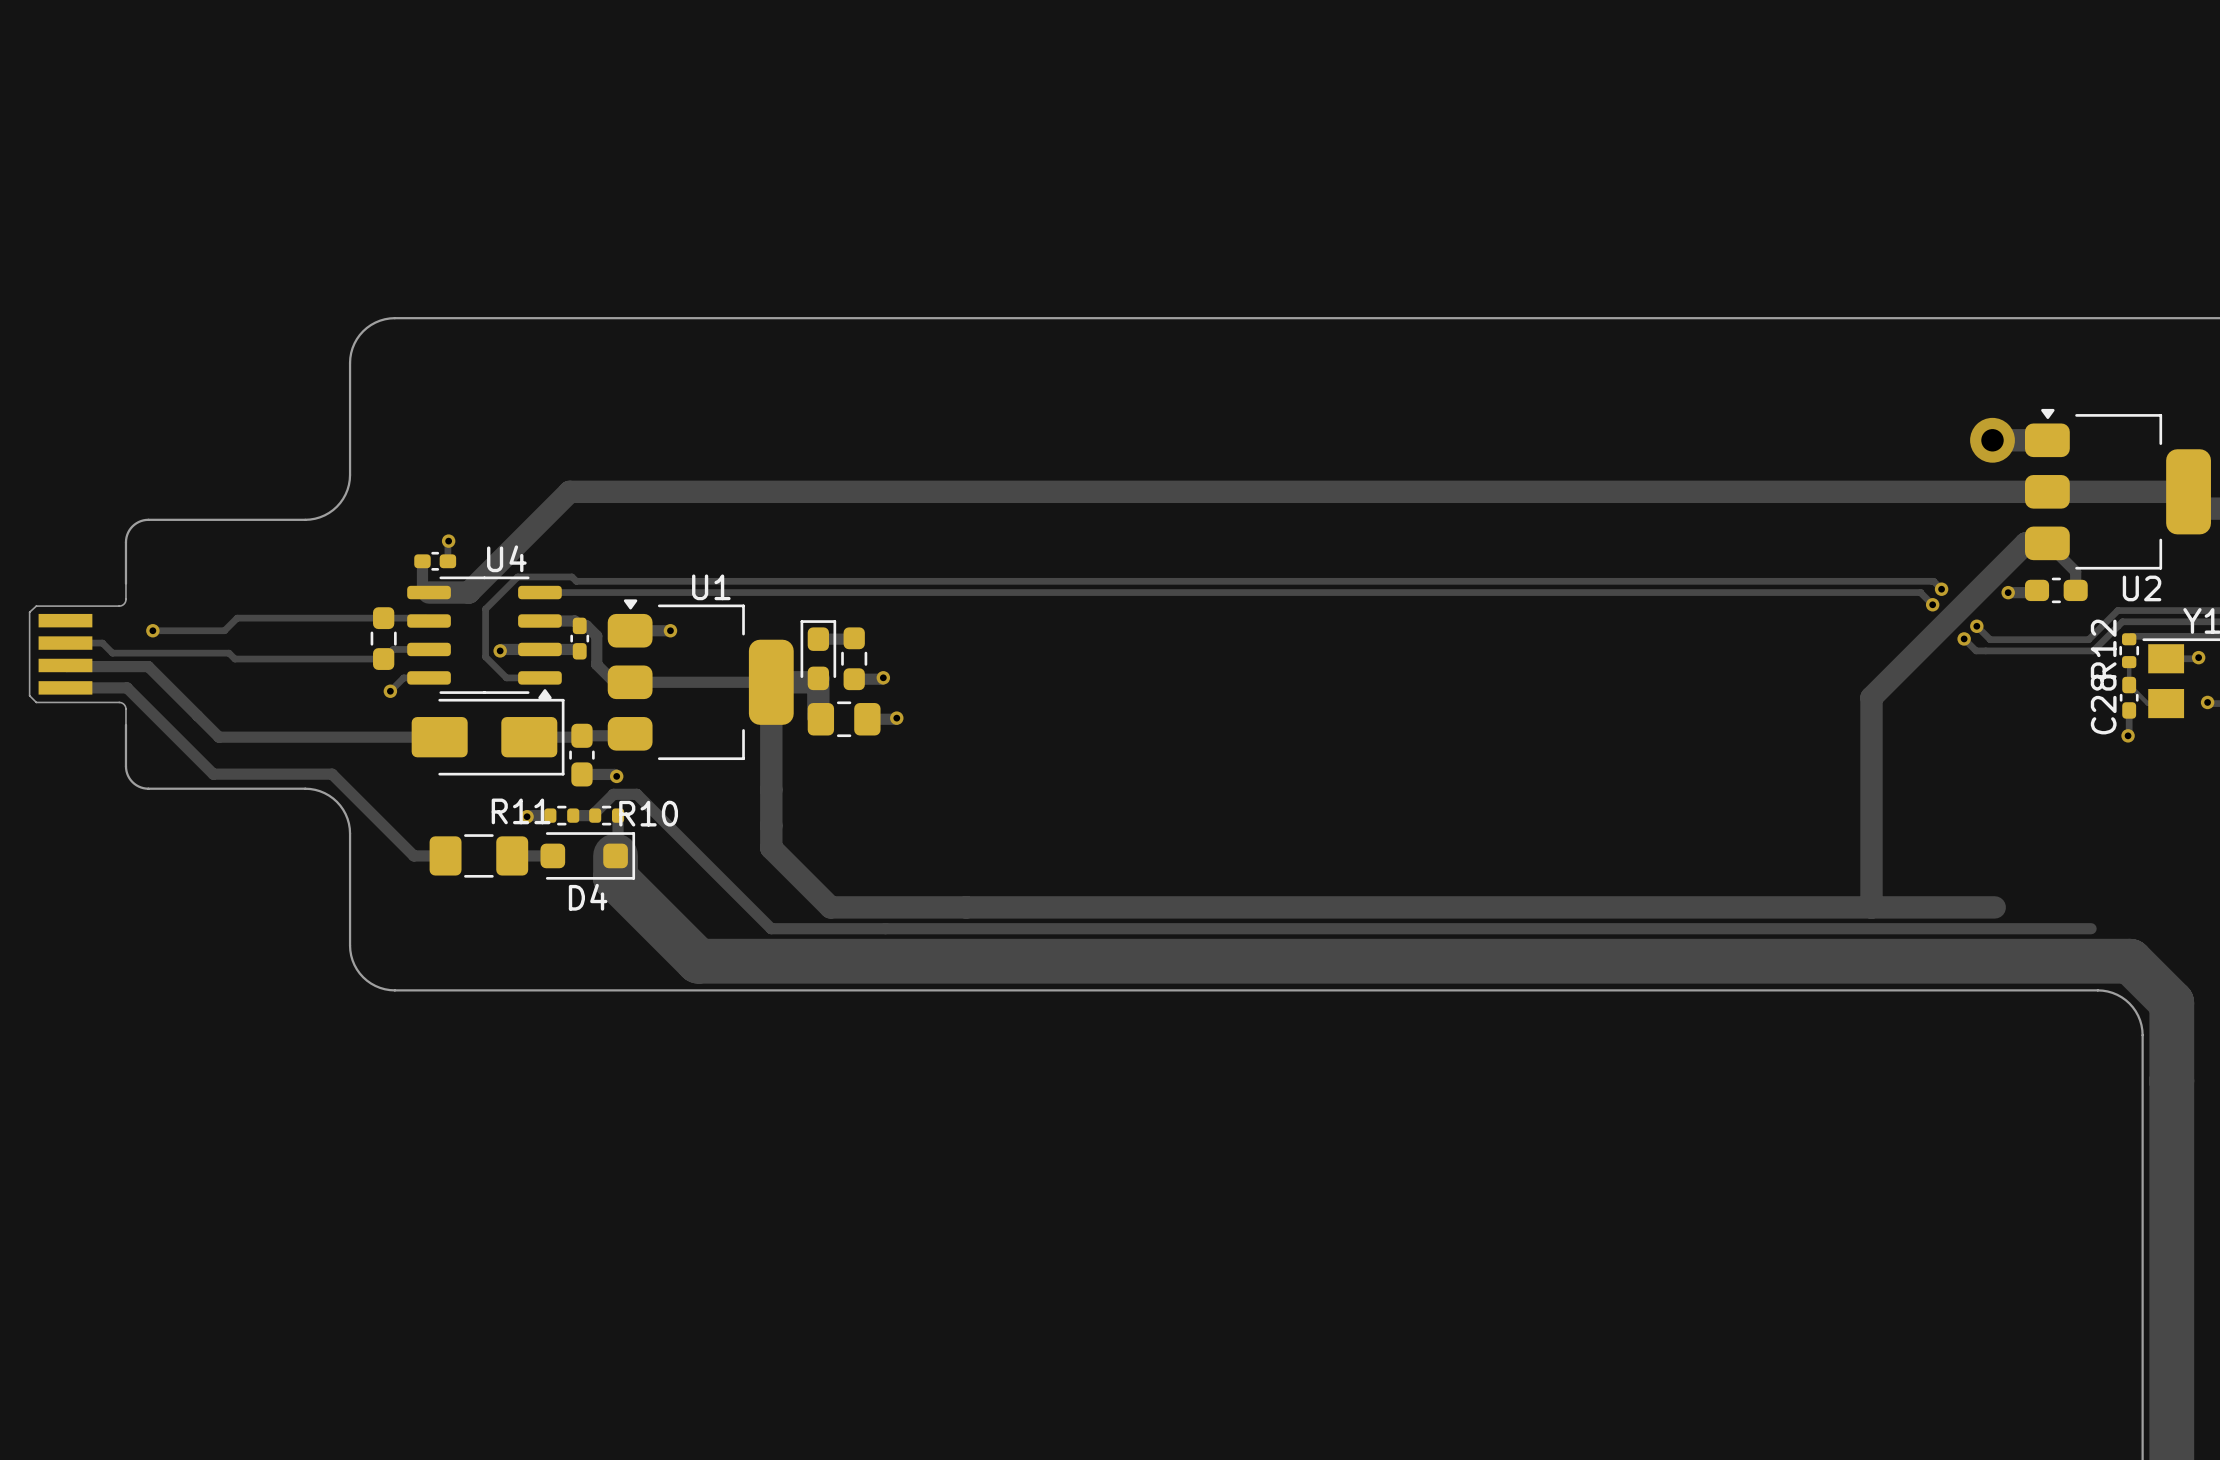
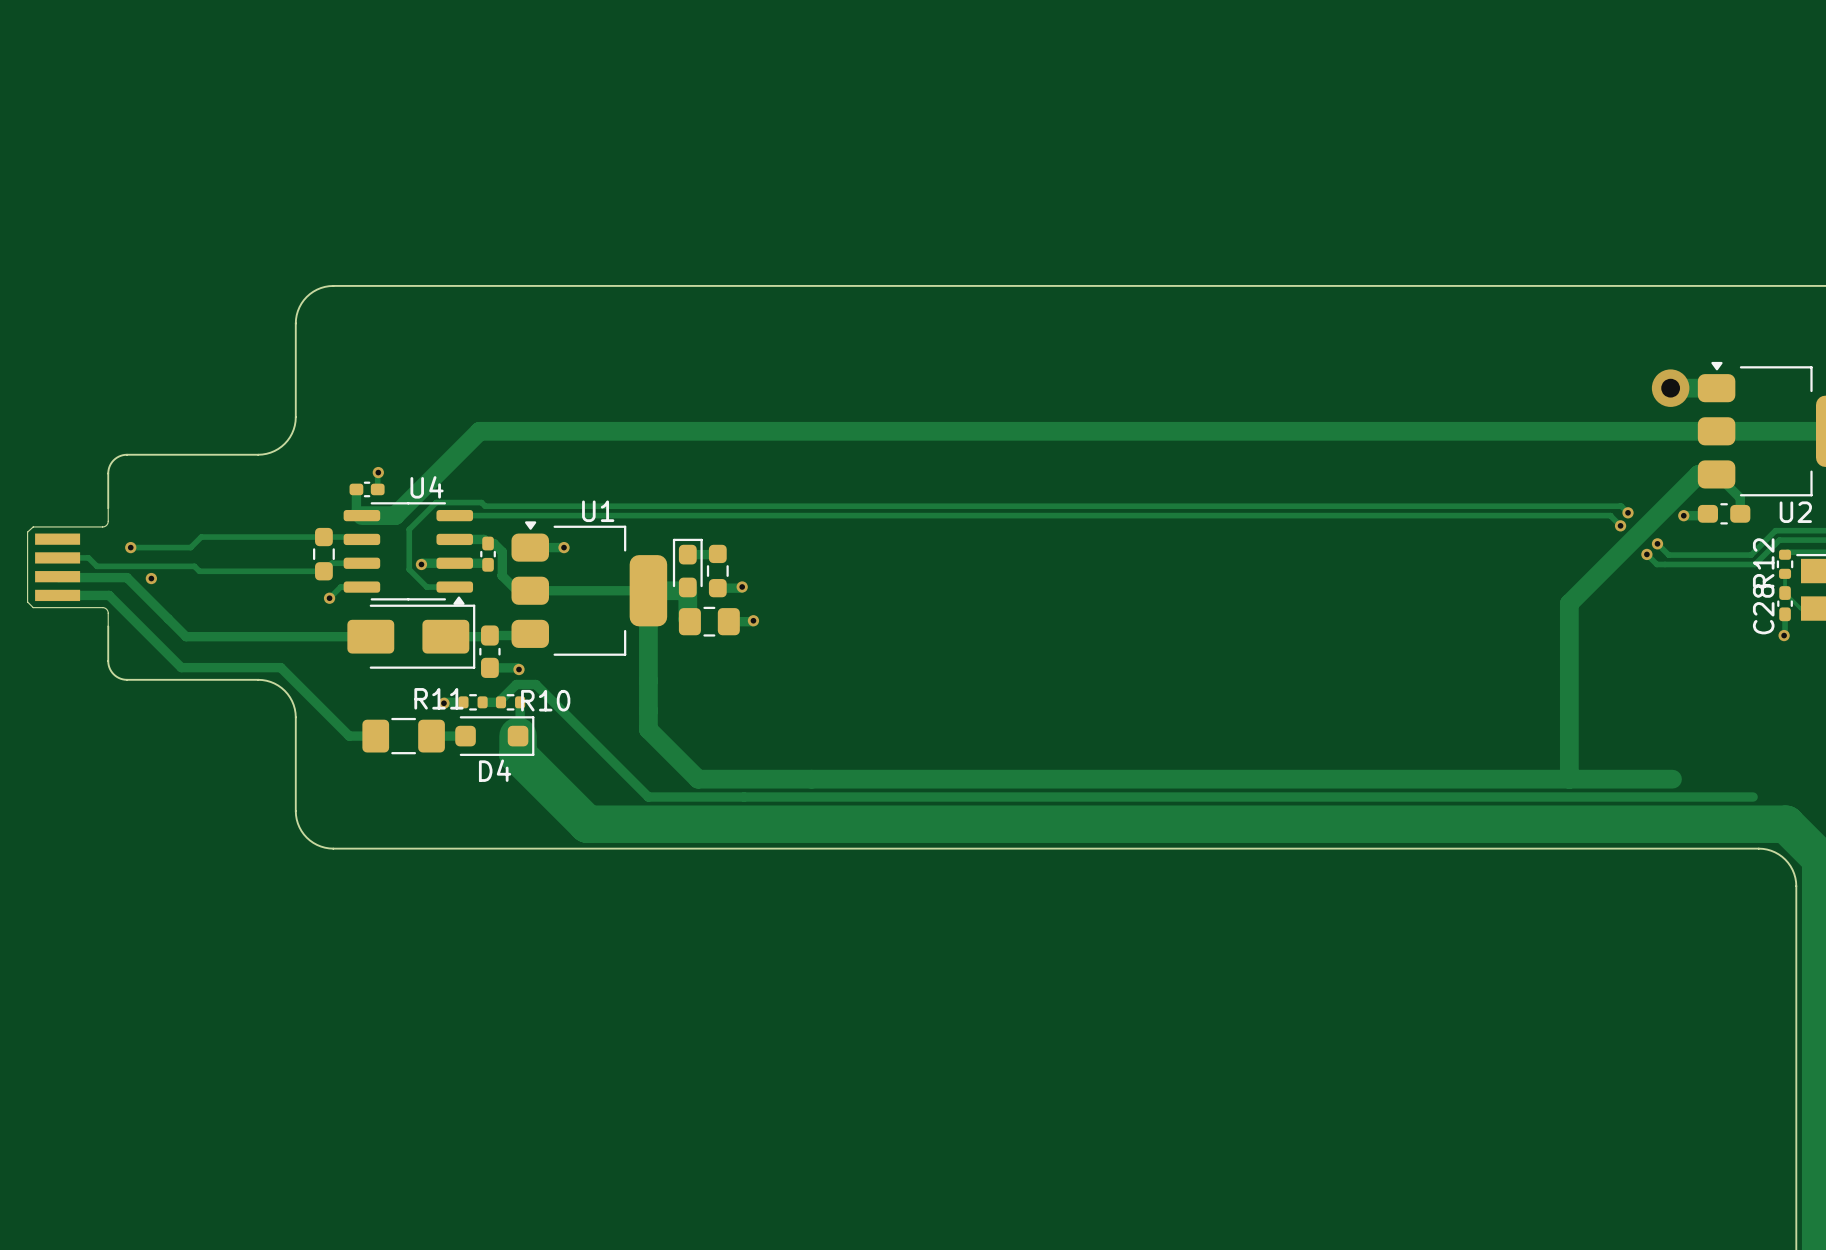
via: none -> (151, 578)

